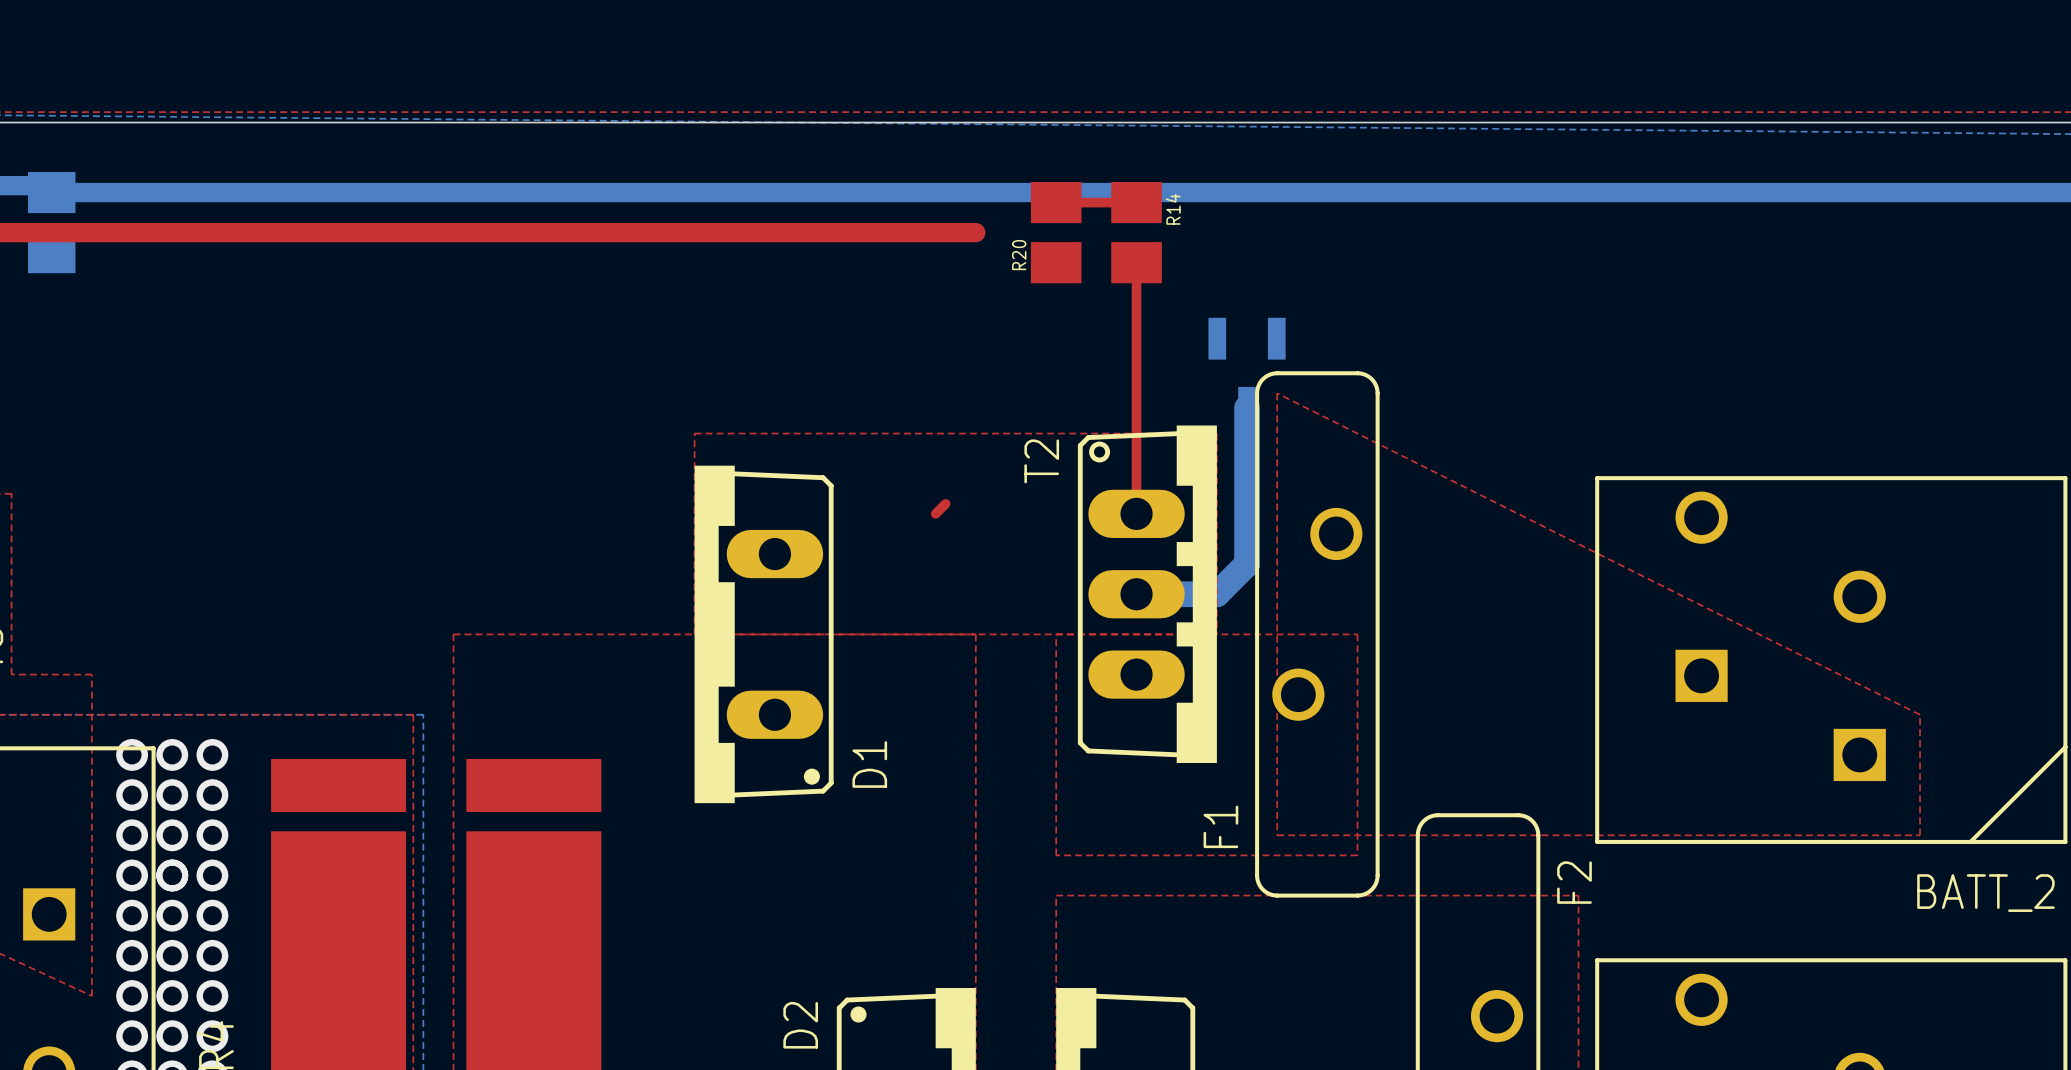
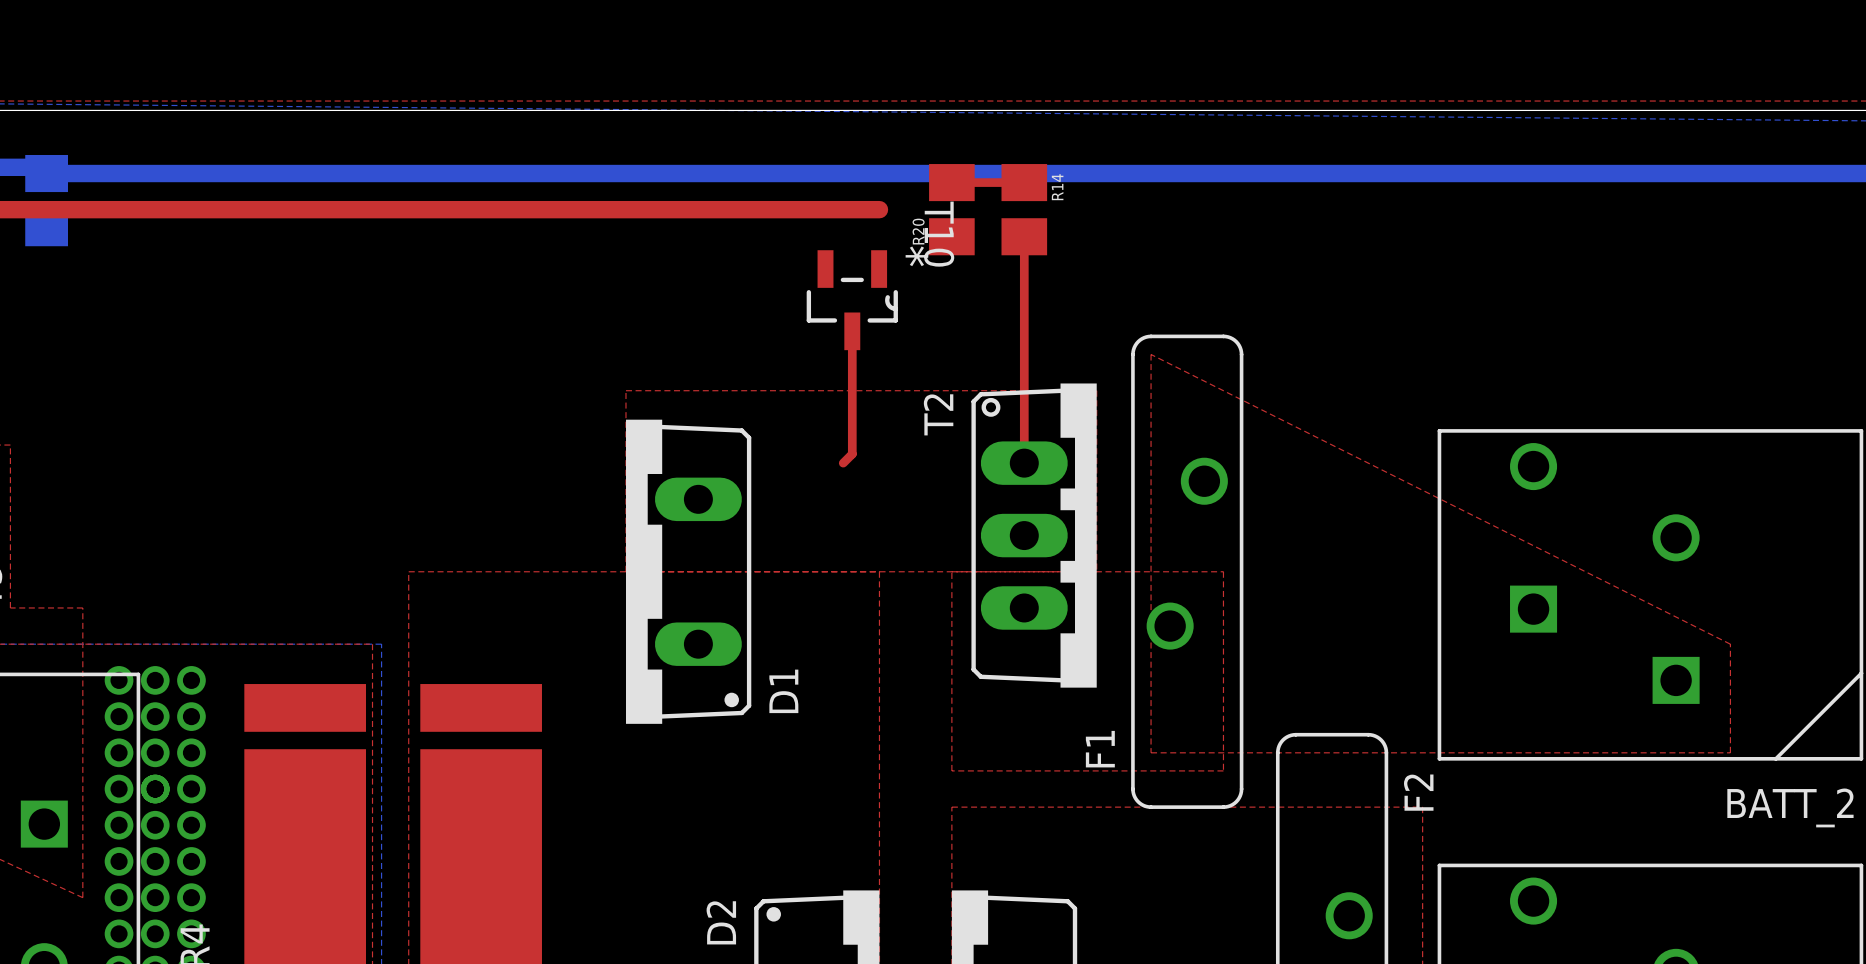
top track: none -> (852, 331) (852, 454)
T10 side: bottom (1247, 373) -> top (852, 300)
bottom track: (1247, 407) (1247, 564) (1216, 594) (1136, 594) -> none

